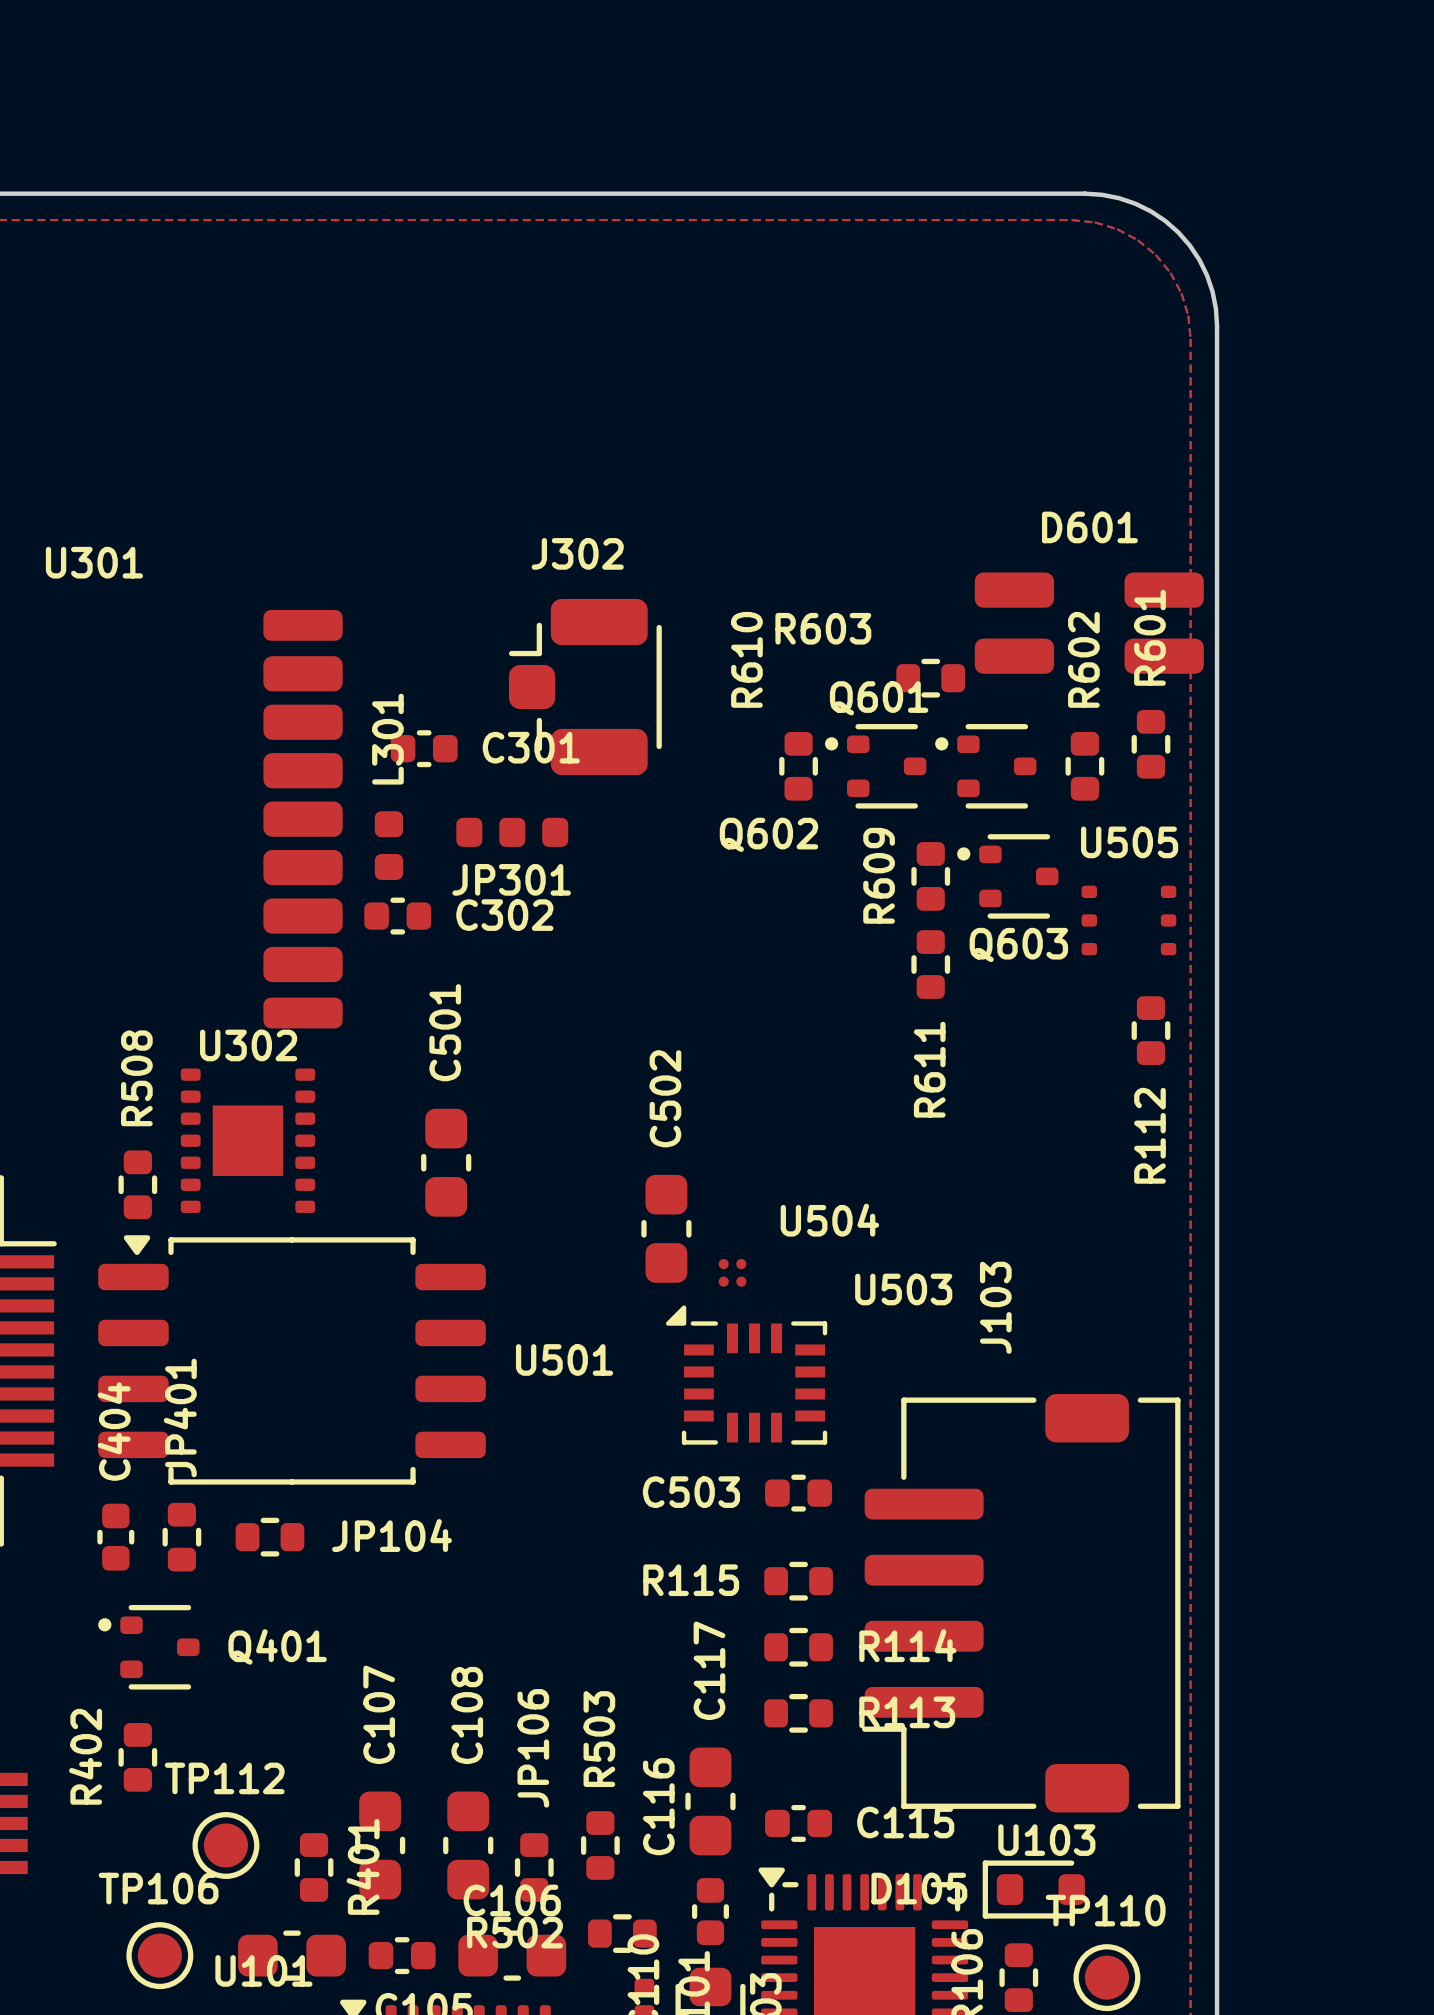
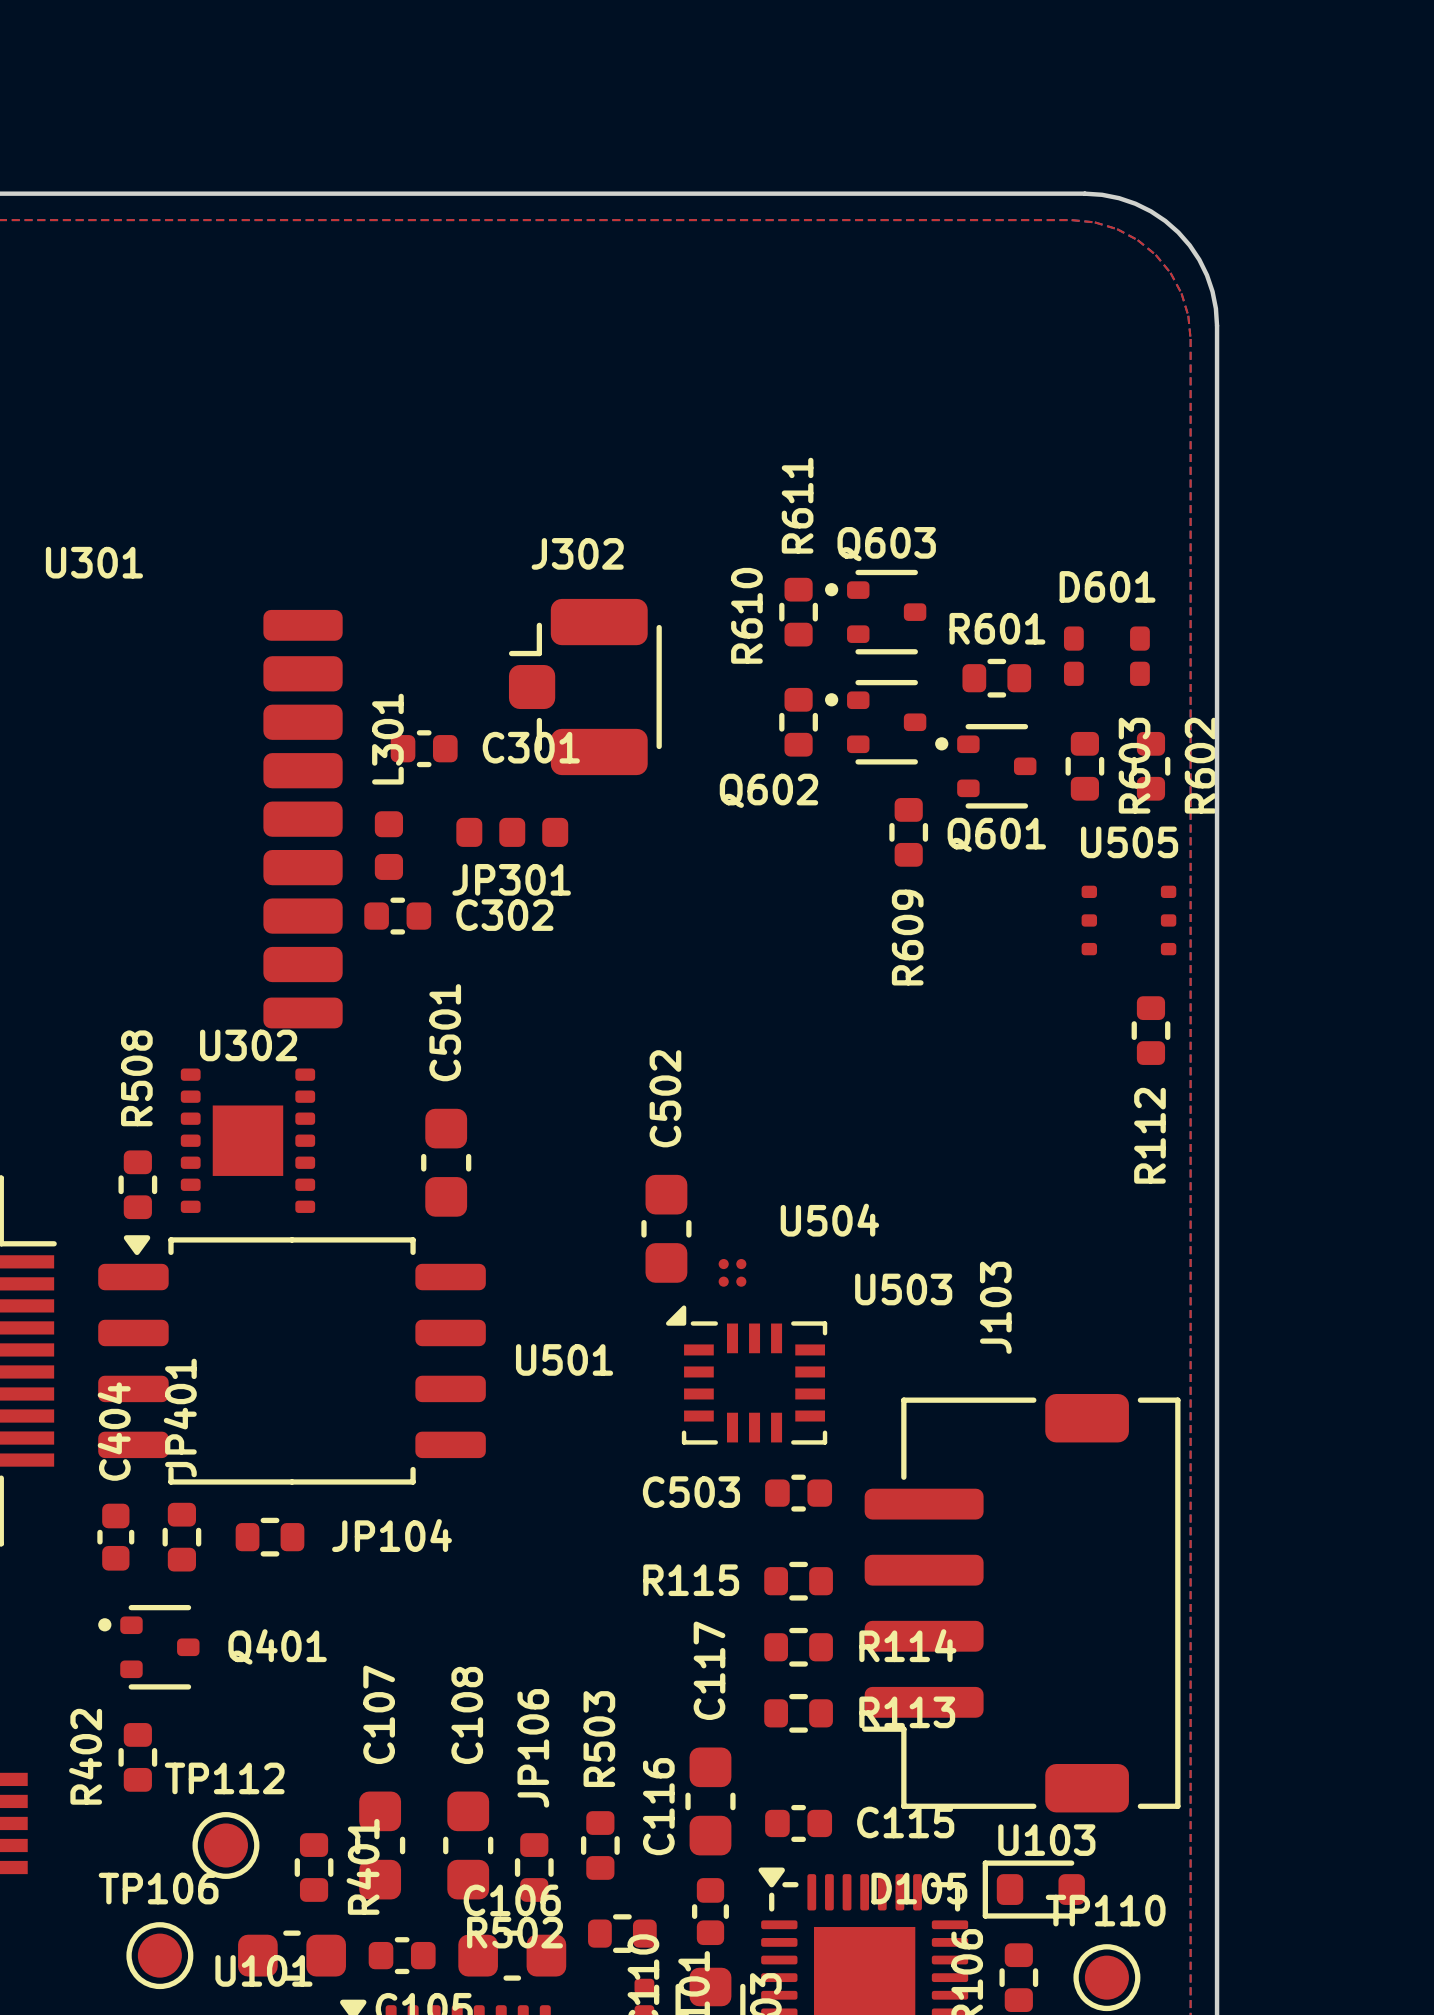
D601 footprint: [974, 572, 1204, 674] -> [1063, 626, 1150, 686]
R602 name: R602 (1083, 659) -> R603 (1134, 765)
R603: (930, 678) -> none
Q601 name position: Q601 (879, 698) -> Q601 (996, 834)
R601 rotation: 0° (1150, 744) -> 90° clockwise (996, 678)
R601 position: (1150, 744) -> (996, 678)
R610 position: (798, 766) -> (798, 722)
Q602 position: (875, 766) -> (875, 722)
R602: none -> (1150, 766)
R609 name position: R609 (879, 875) -> R609 (907, 937)
R609 position: (930, 876) -> (908, 832)
Q603 position: (1007, 876) -> (875, 612)
Q603 name position: Q603 (1018, 944) -> Q603 (886, 544)
R611 position: (930, 964) -> (798, 612)
R611 name position: R611 (929, 1069) -> R611 (797, 505)

